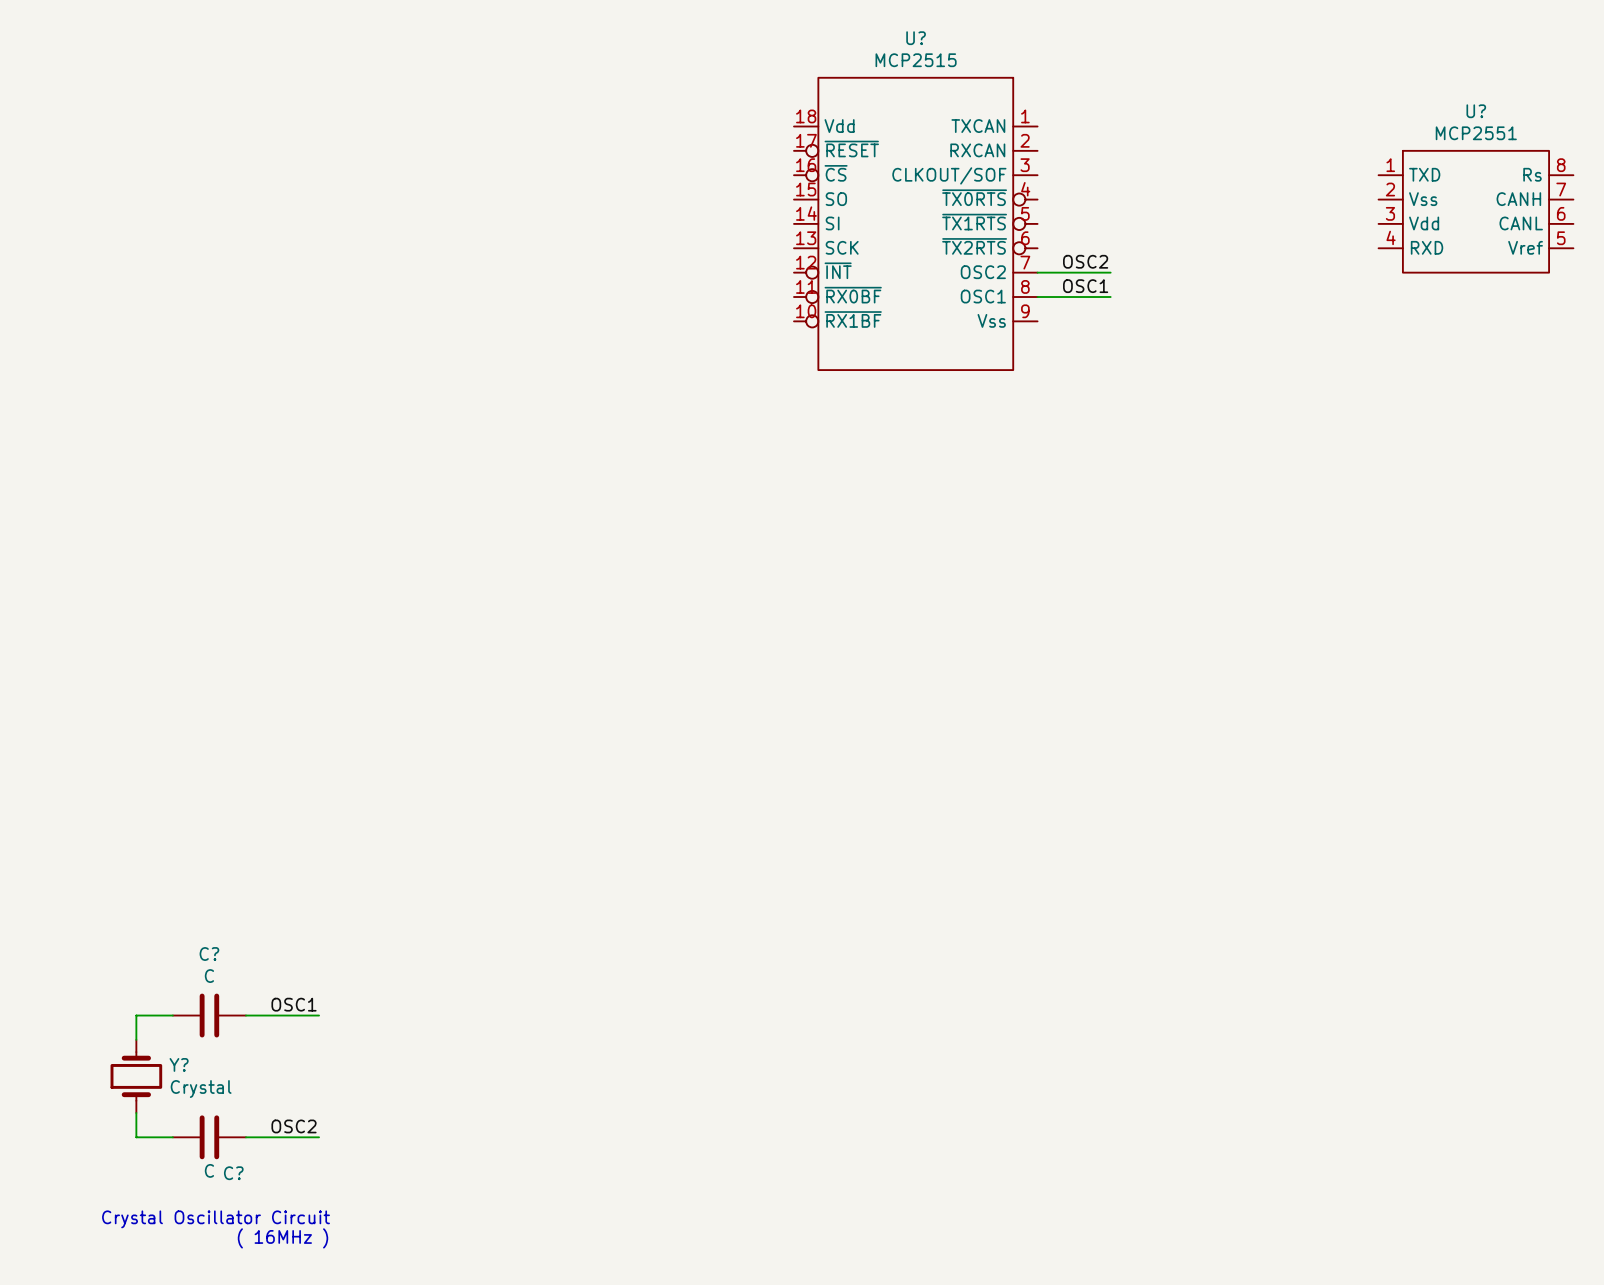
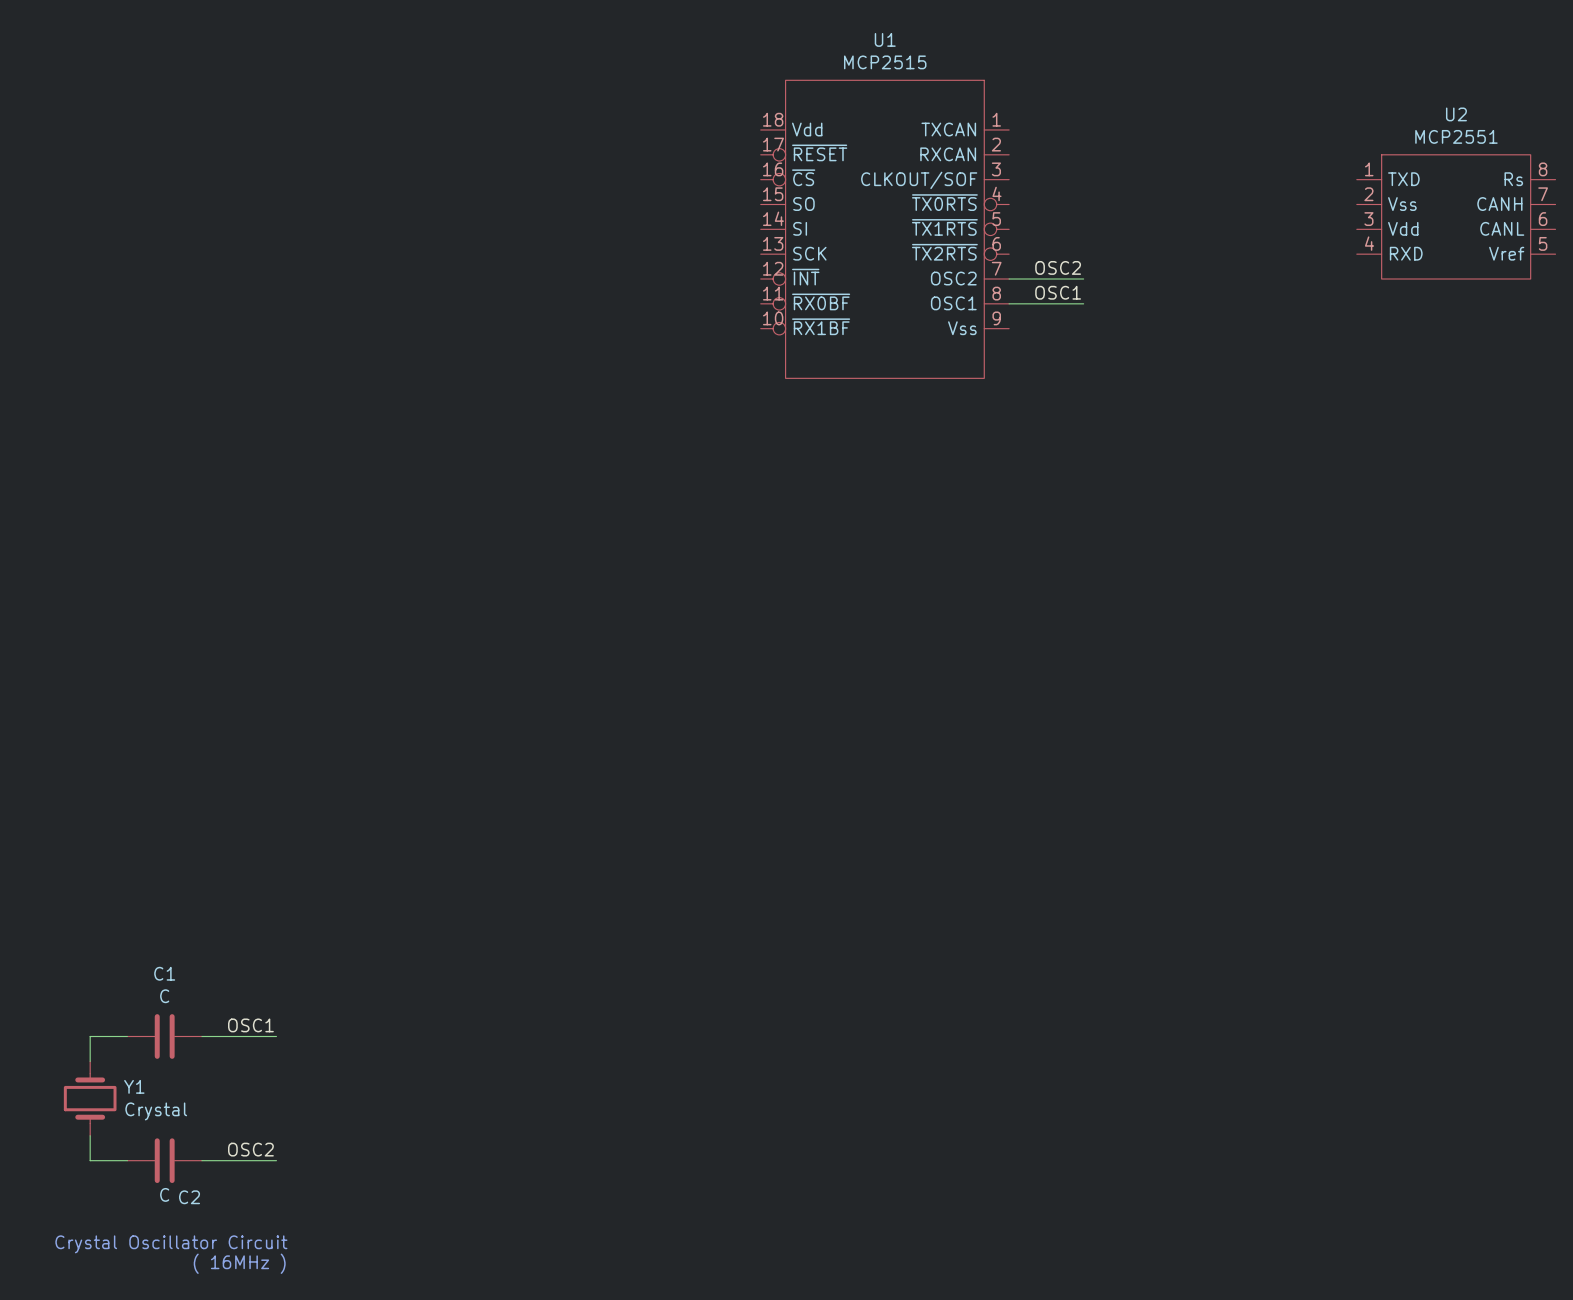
U? name: U? (916, 38) -> U1 (885, 39)
U? name: U? (1476, 111) -> U2 (1456, 114)
C? name: C? (209, 954) -> C1 (164, 973)
Y? name: Y? (179, 1064) -> Y1 (134, 1086)
C? name: C? (233, 1173) -> C2 (189, 1197)

